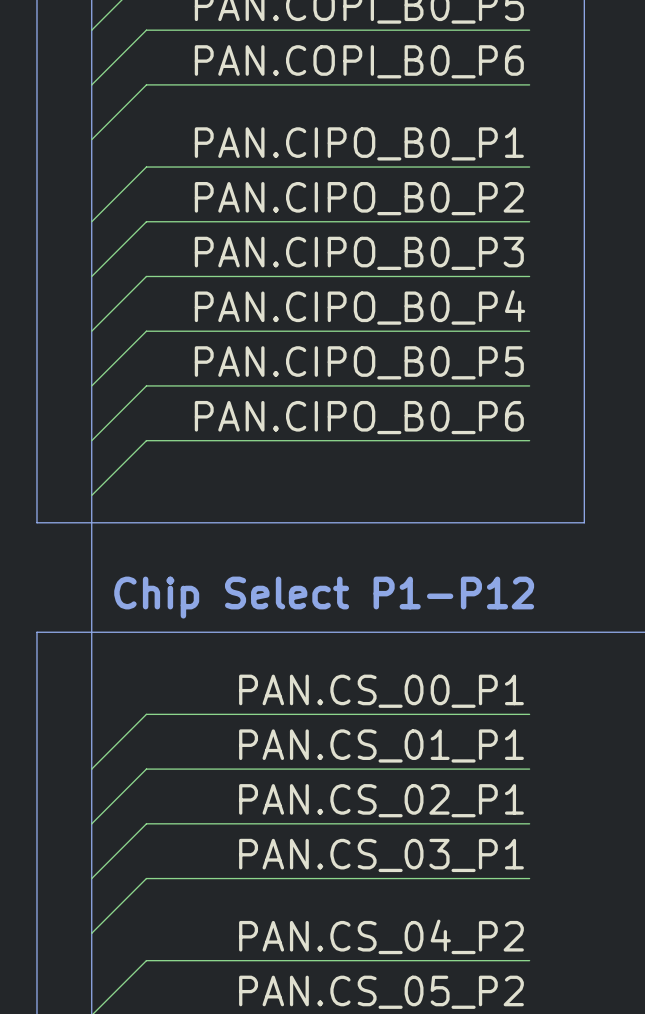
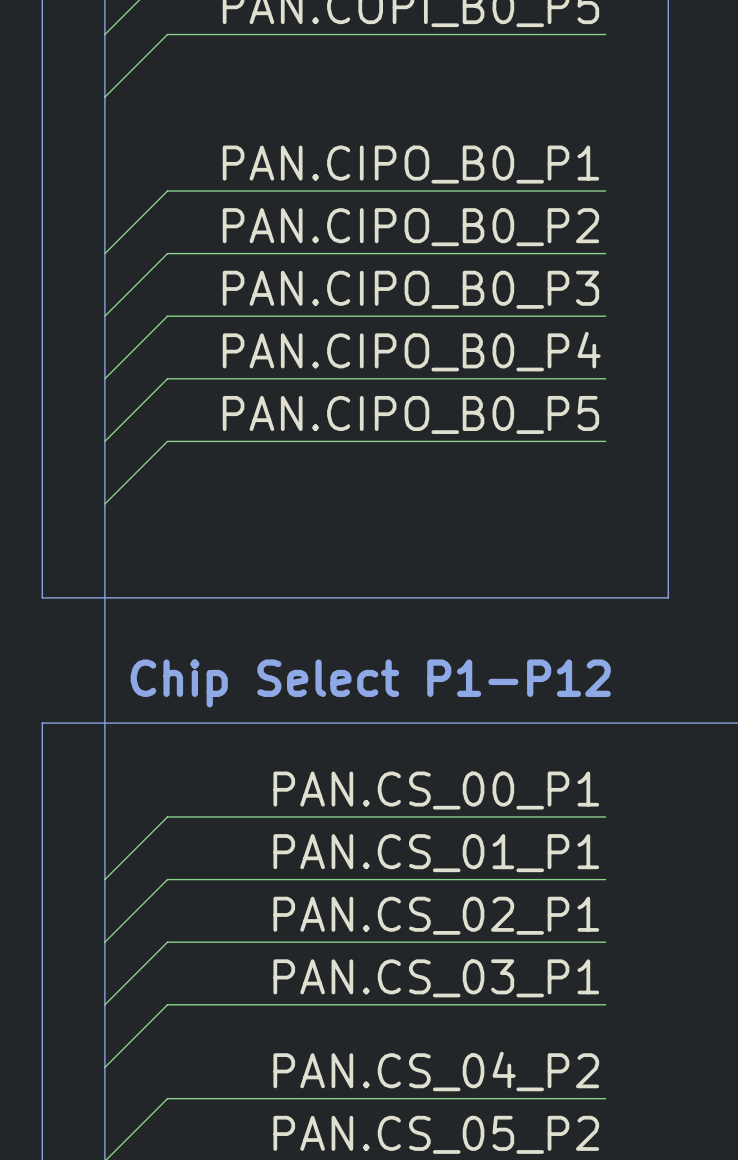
label: PAN.COPI_B0_P6 (359, 61) -> none
wire: (529, 84) (146, 84) (91, 139) -> none
label: PAN.CIPO_B0_P6 (359, 417) -> none
wire: (529, 440) (146, 440) (91, 495) -> none

